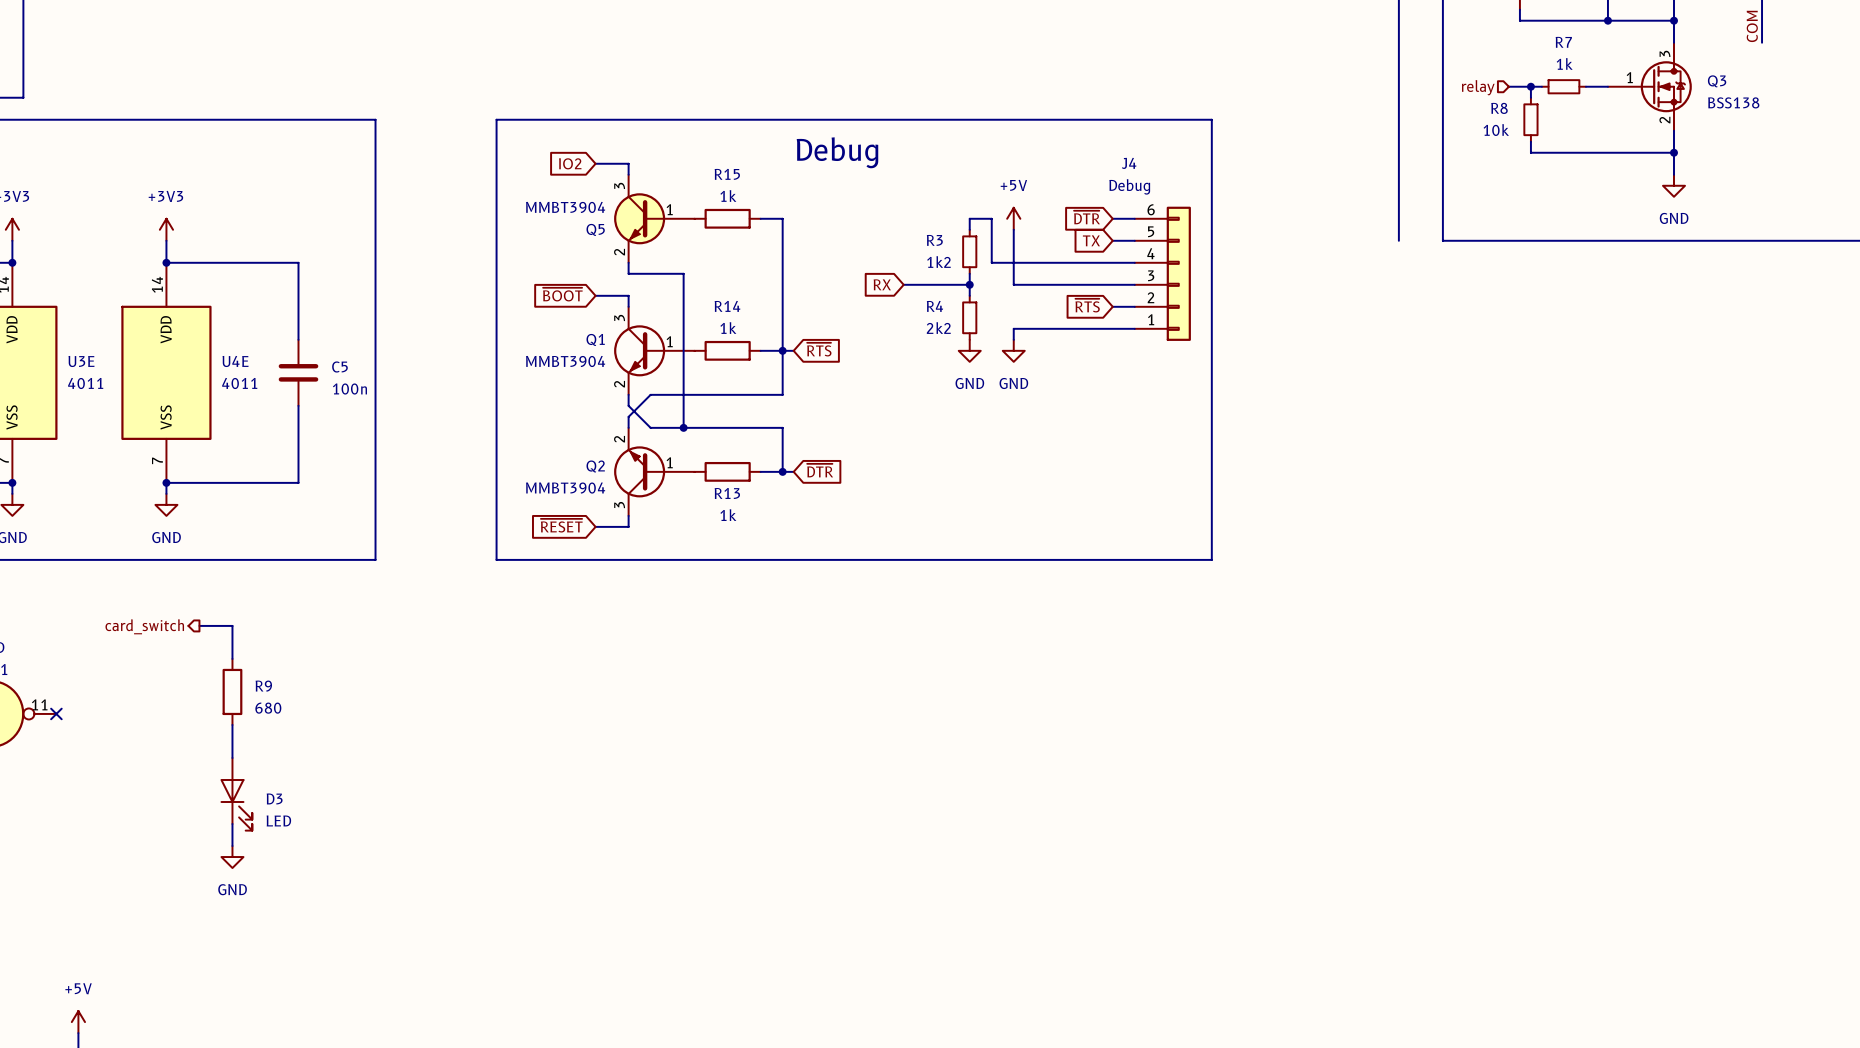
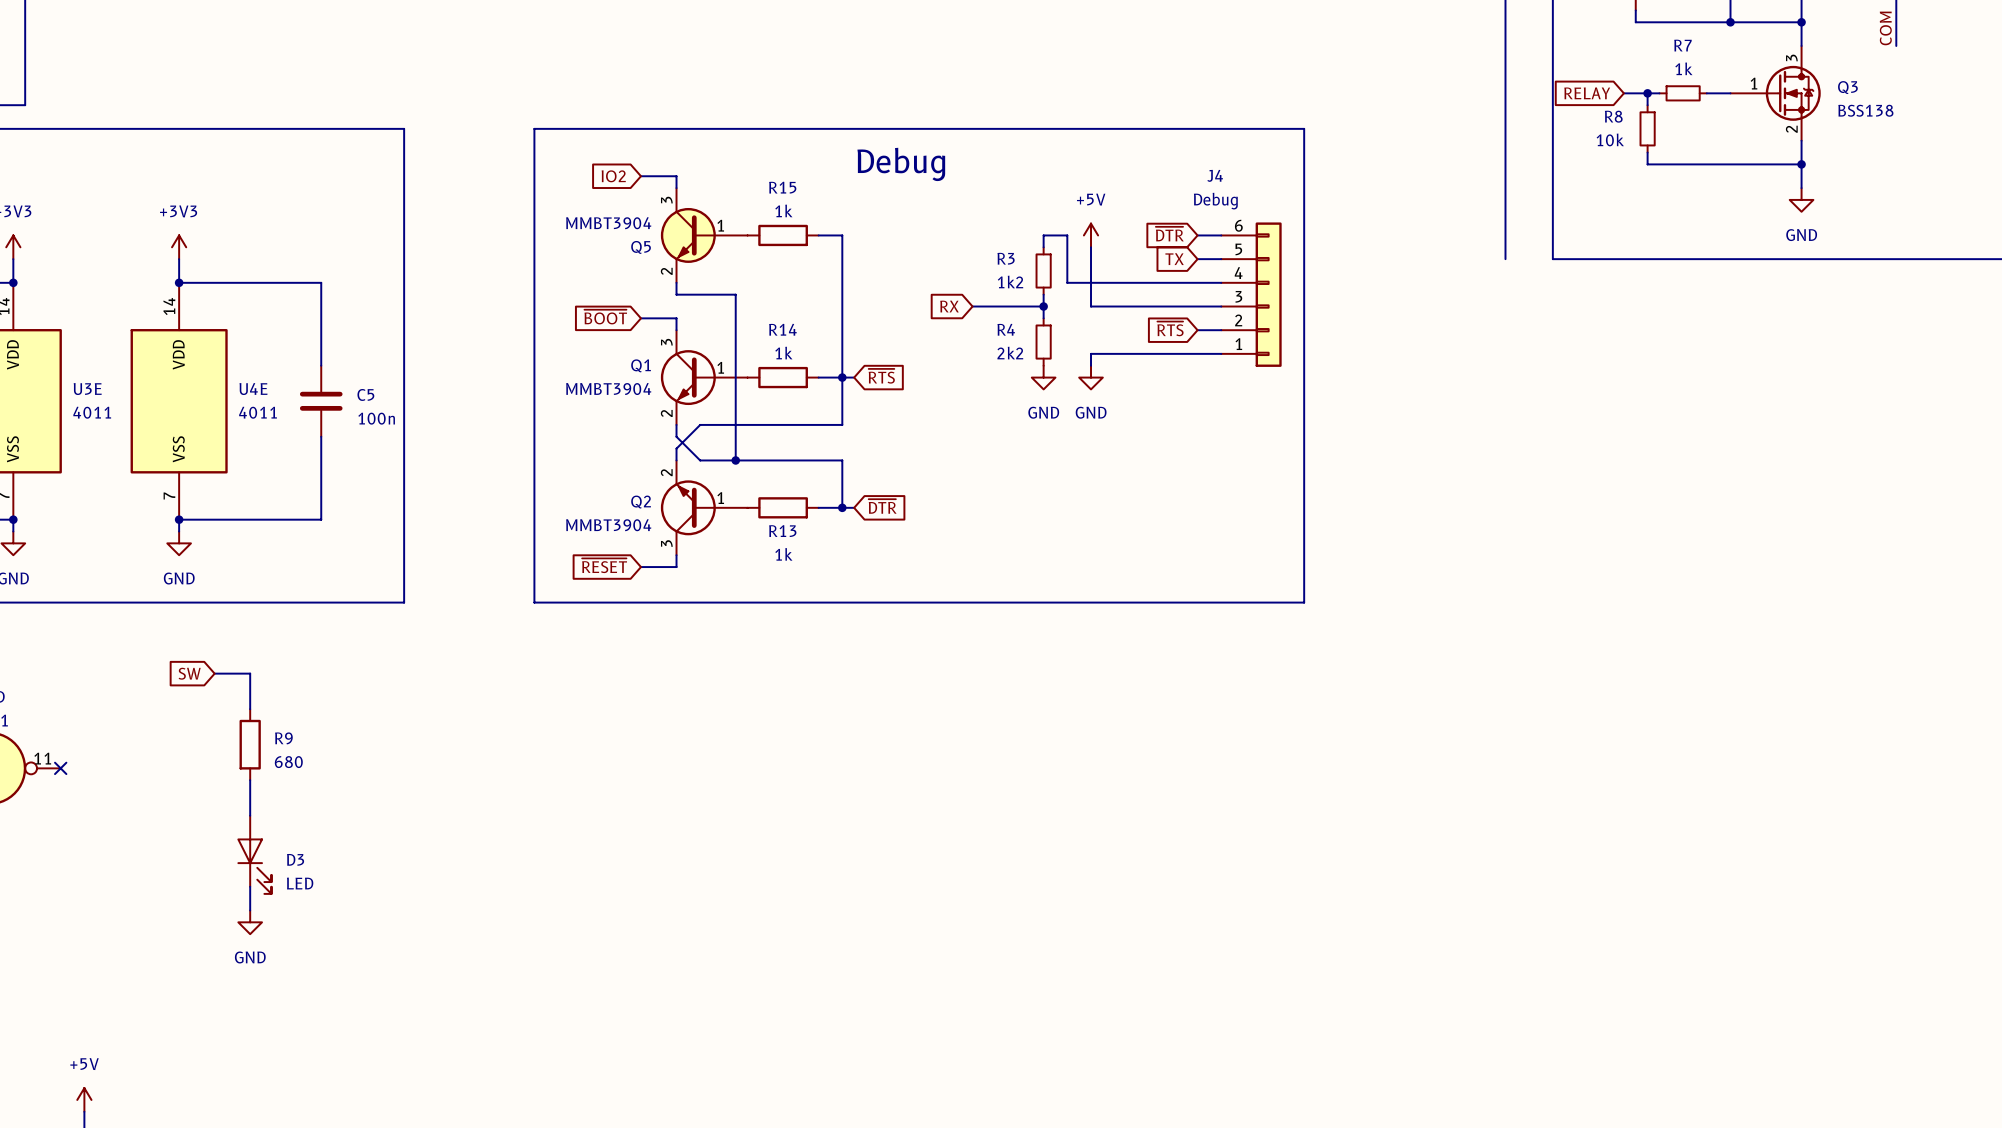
global label: none -> RELAY (1587, 93)
hierarchical label: relay (1478, 87) -> none
global label: none -> SW (189, 673)
hierarchical label: card_switch (144, 626) -> none

